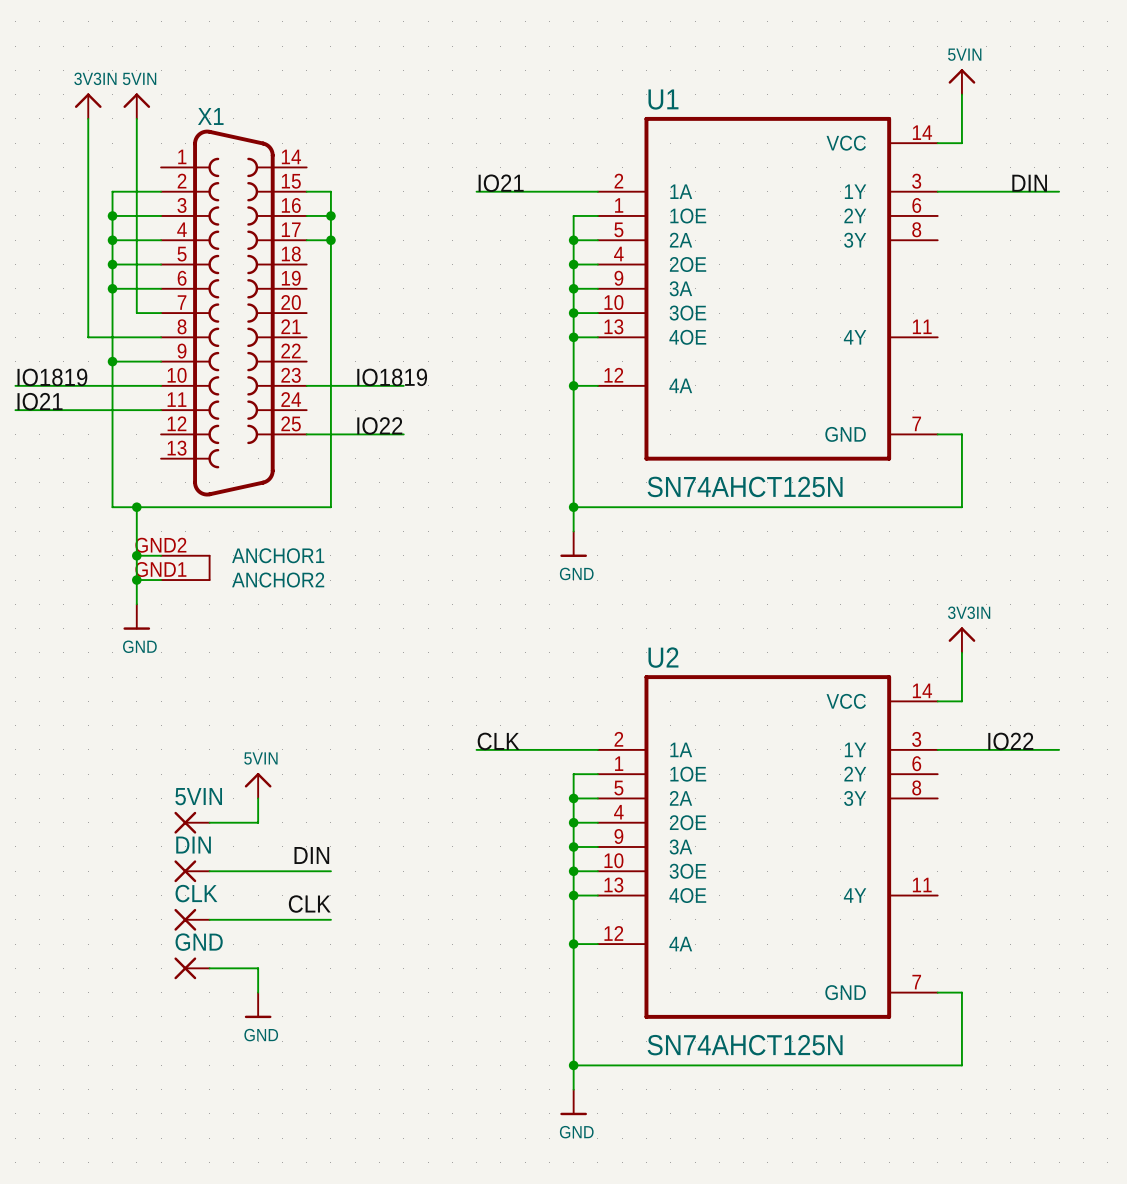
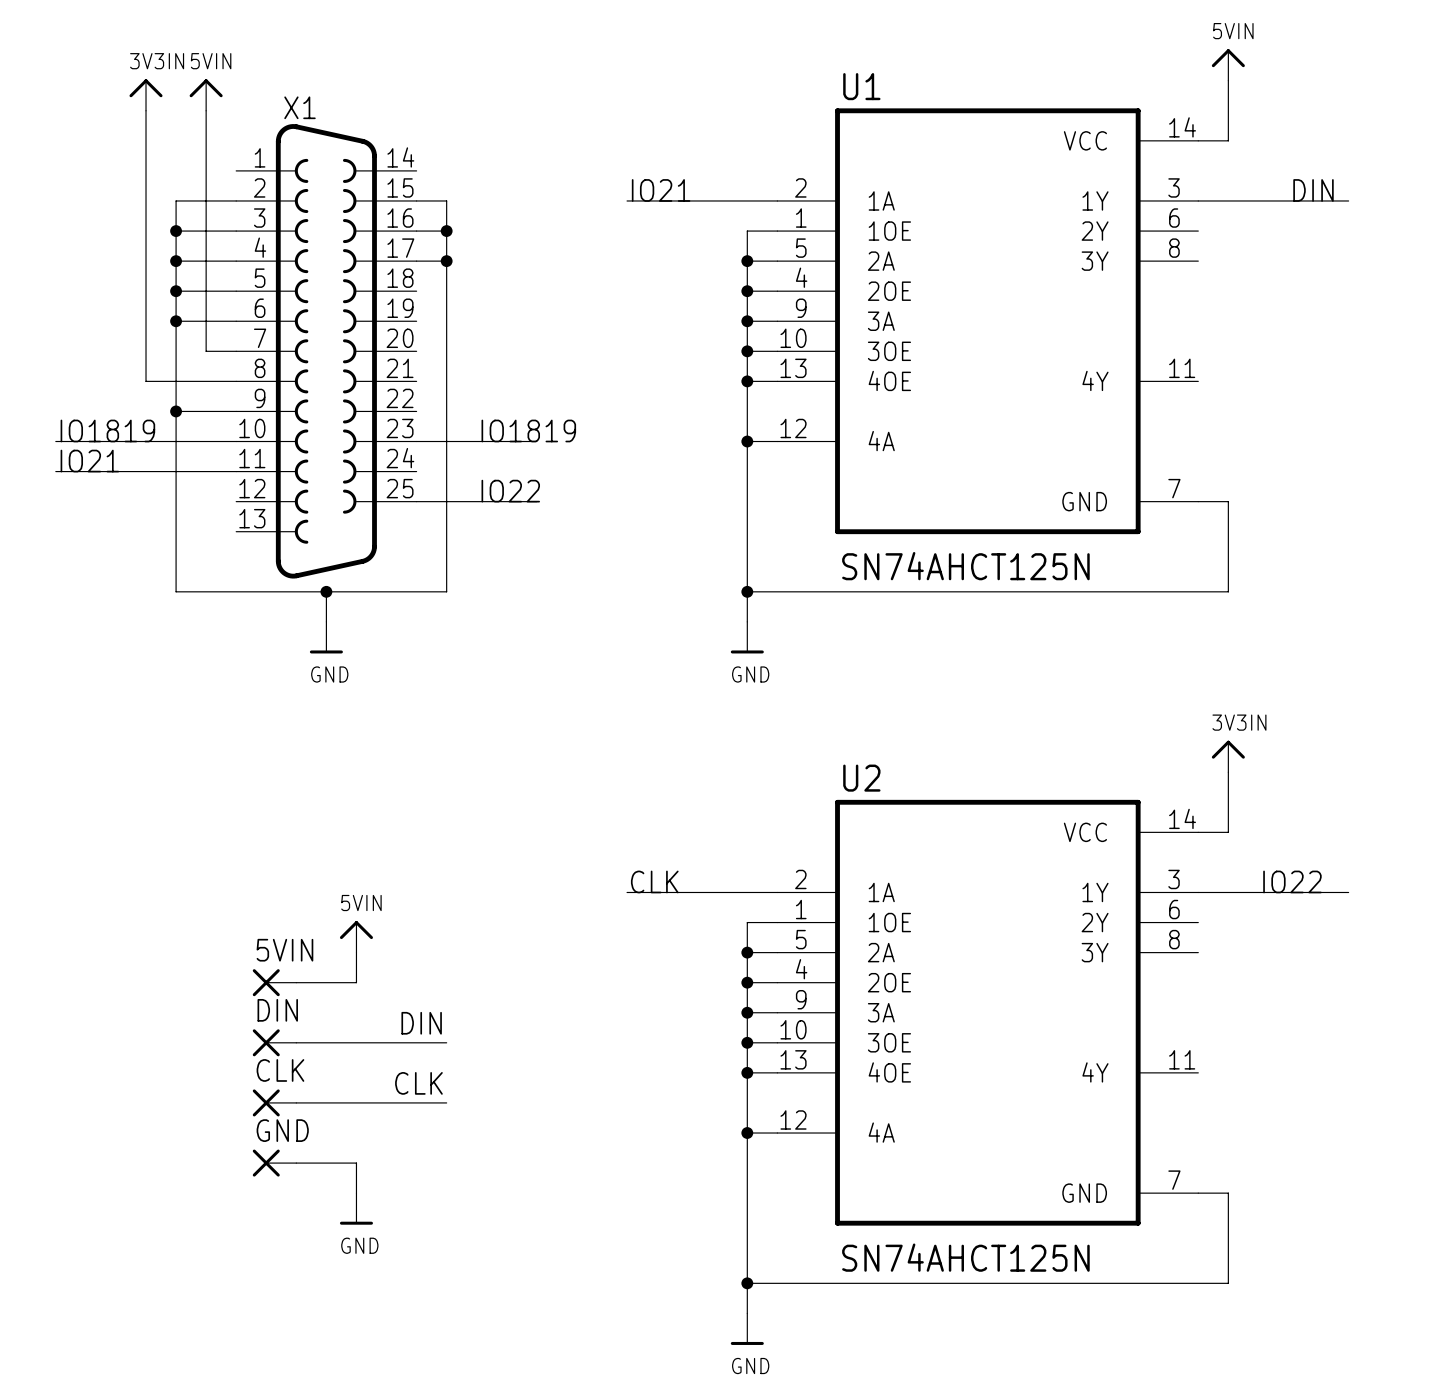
X1 symbol: [161, 129, 307, 581] -> [236, 124, 417, 579]
wire: (136, 507) (136, 604) -> none
junction: (136, 507) -> none
wire: none -> (326, 591) (326, 621)
junction: none -> (326, 591)
wire: (136, 555) (161, 555) -> none
junction: (136, 555) -> none
wire: (136, 580) (161, 580) -> none
junction: (136, 580) -> none
power symbol position: GND (136, 617) -> GND (326, 637)

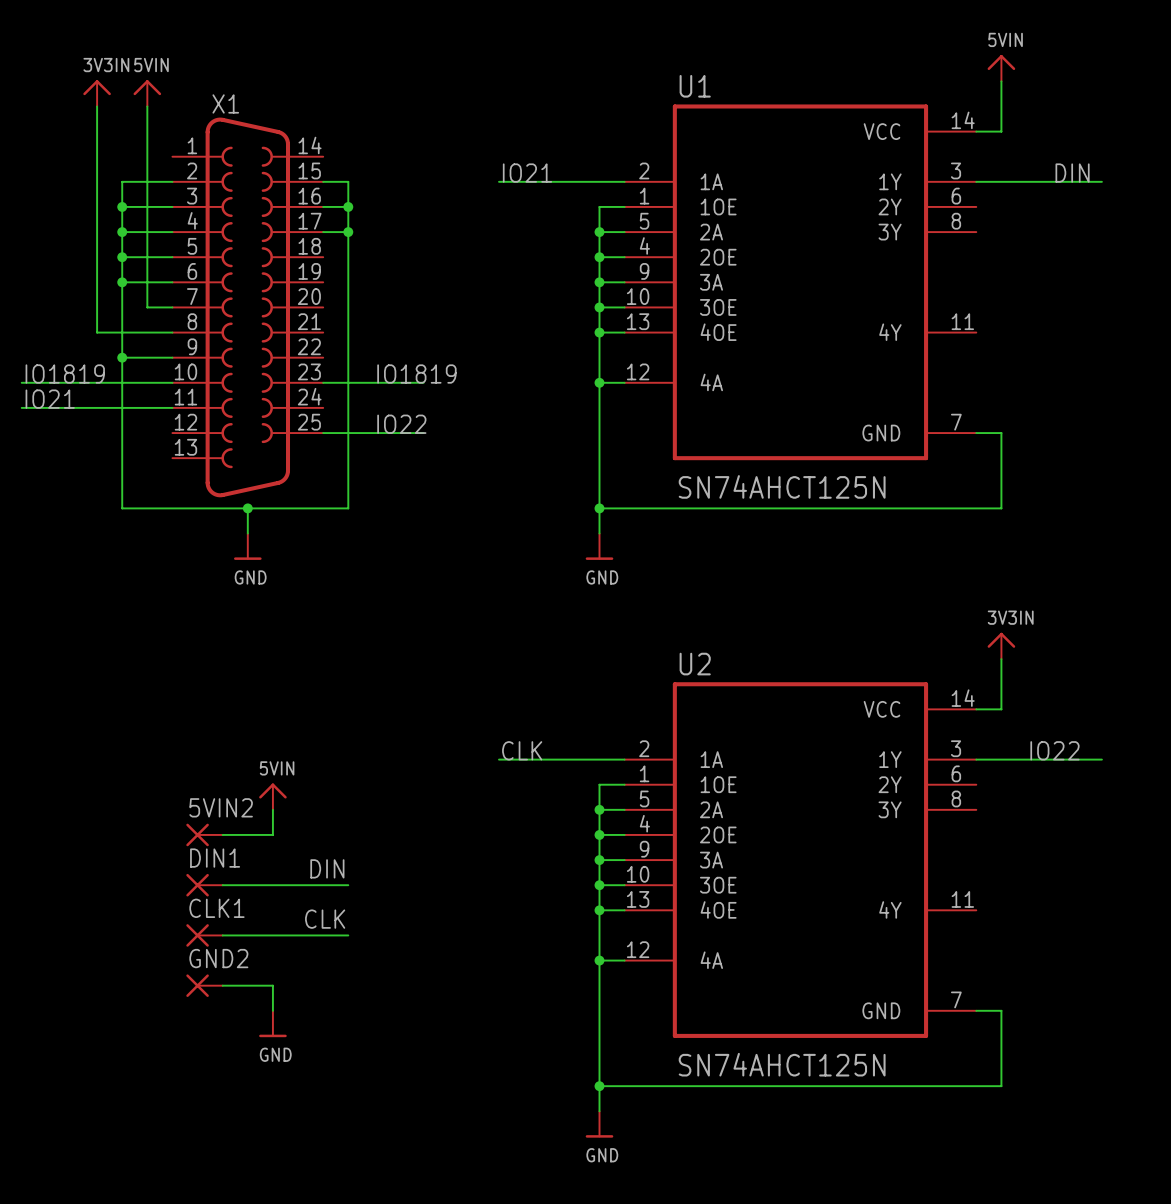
5VIN name: 5VIN (284, 950) -> 5VIN2 (221, 807)
DIN name: DIN (277, 1010) -> DIN1 (215, 858)
CLK name: CLK (280, 1070) -> CLK1 (216, 908)
GND name: GND (282, 1130) -> GND2 (218, 958)

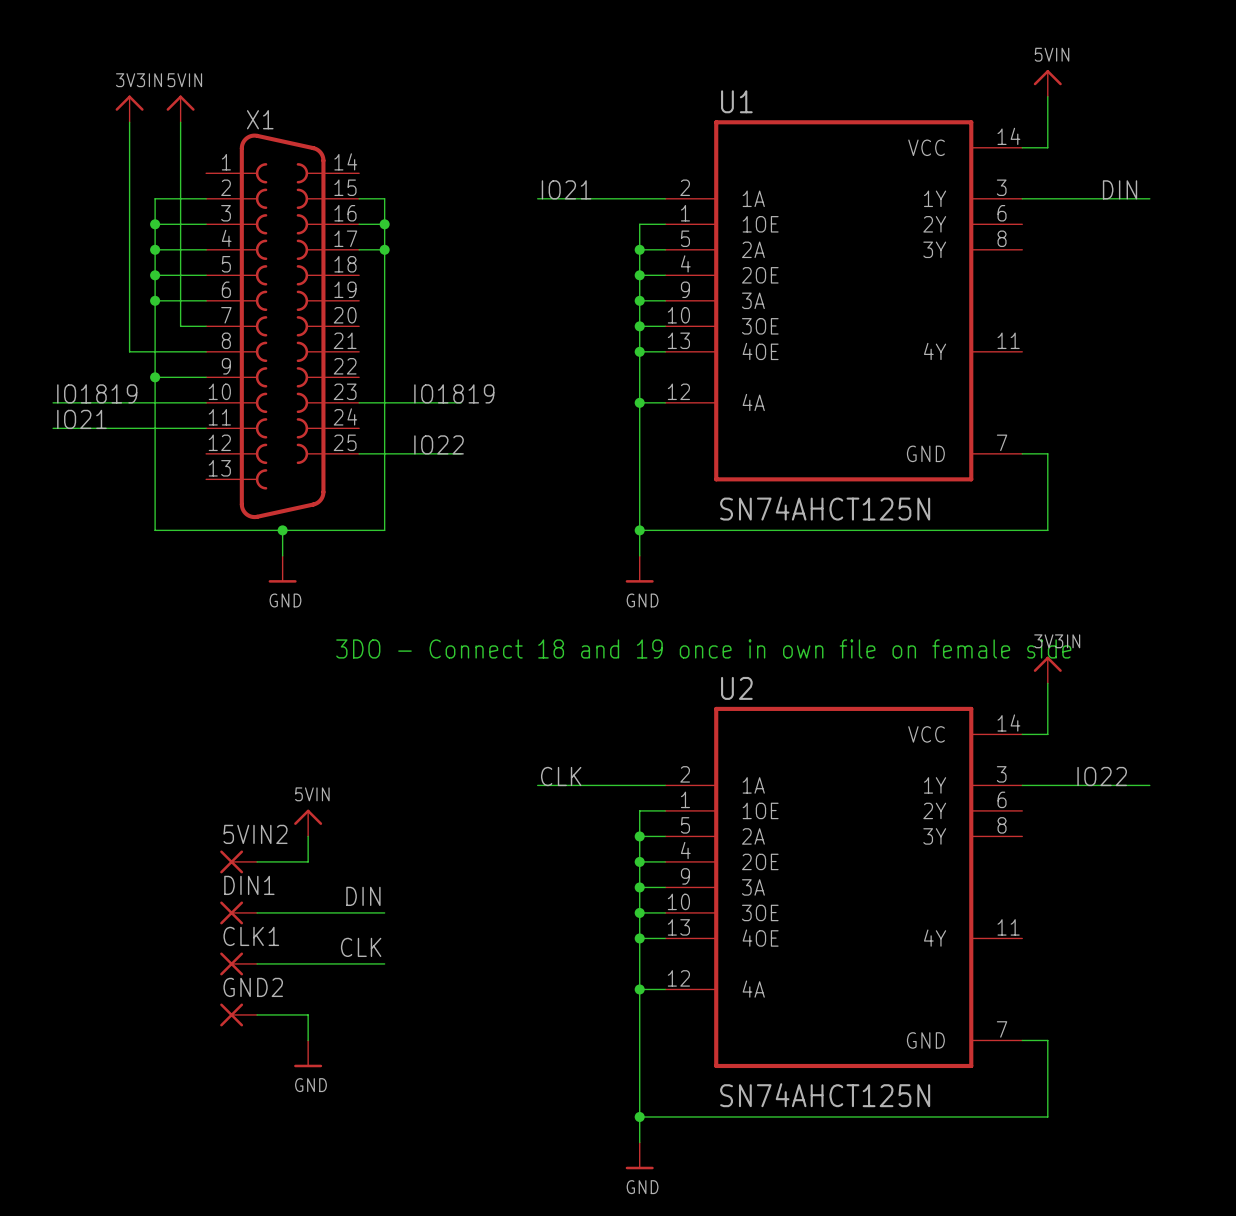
text: none -> 3DO - Connect 18 and 19 once in own file on female side (703, 648)

